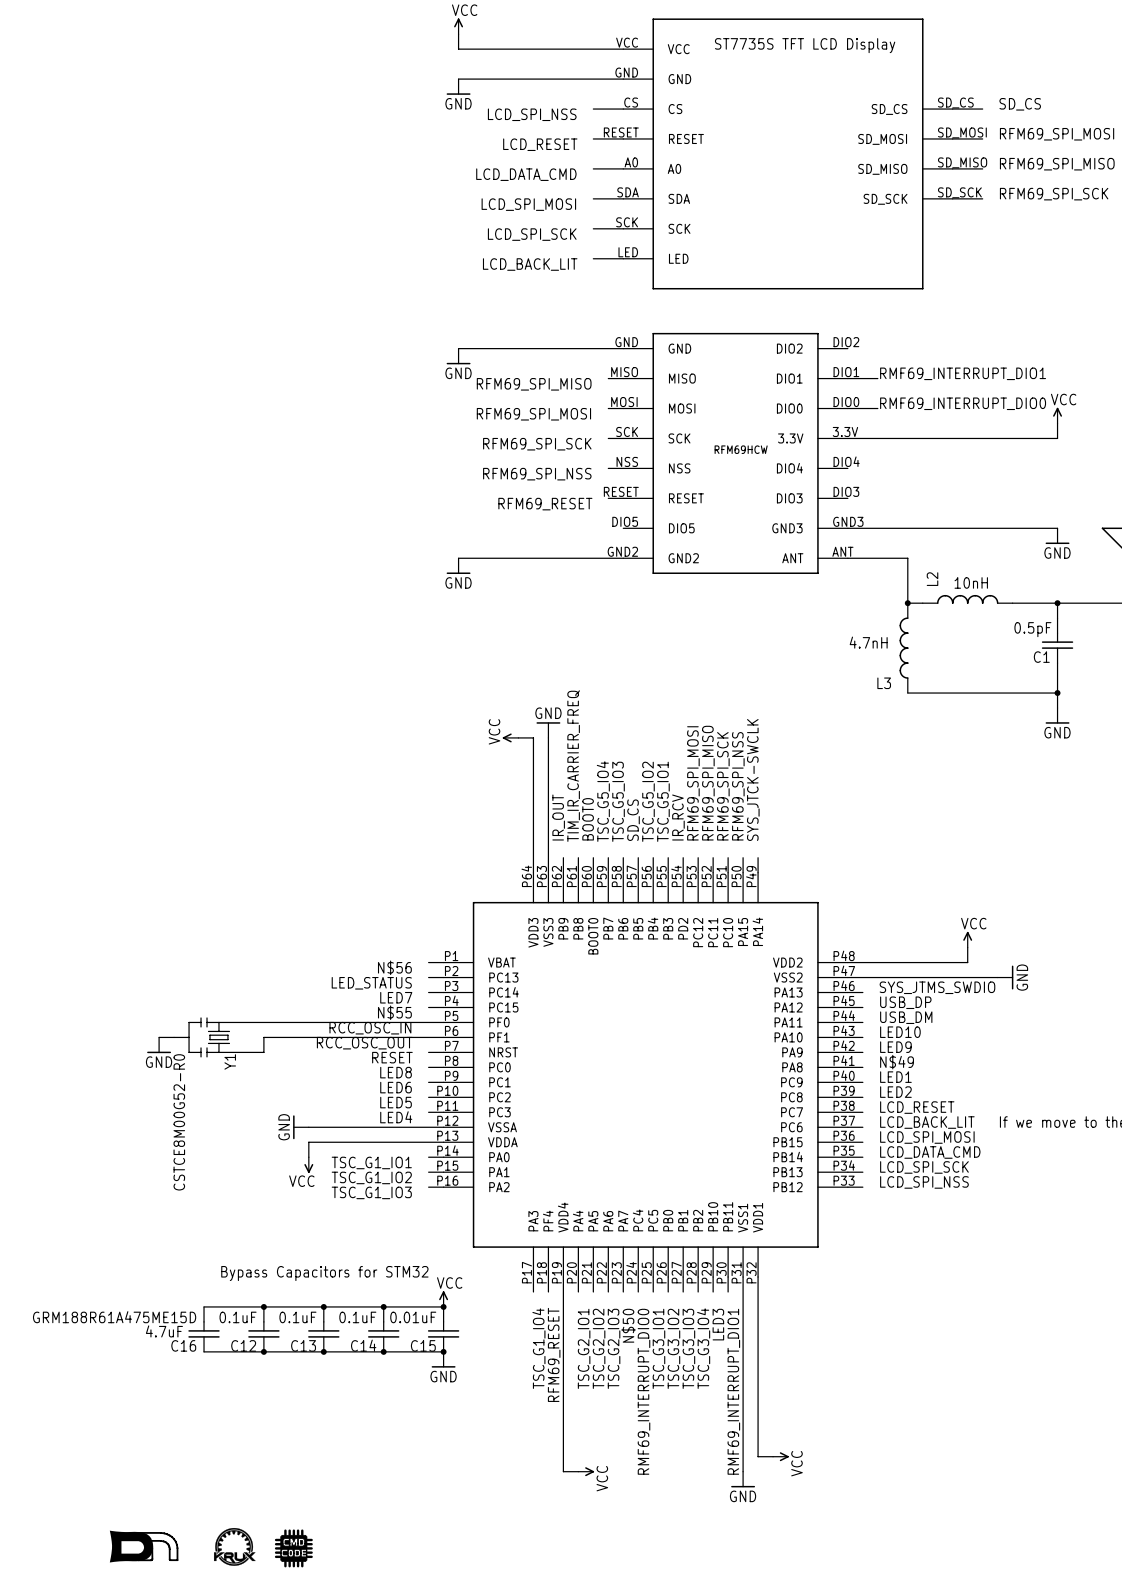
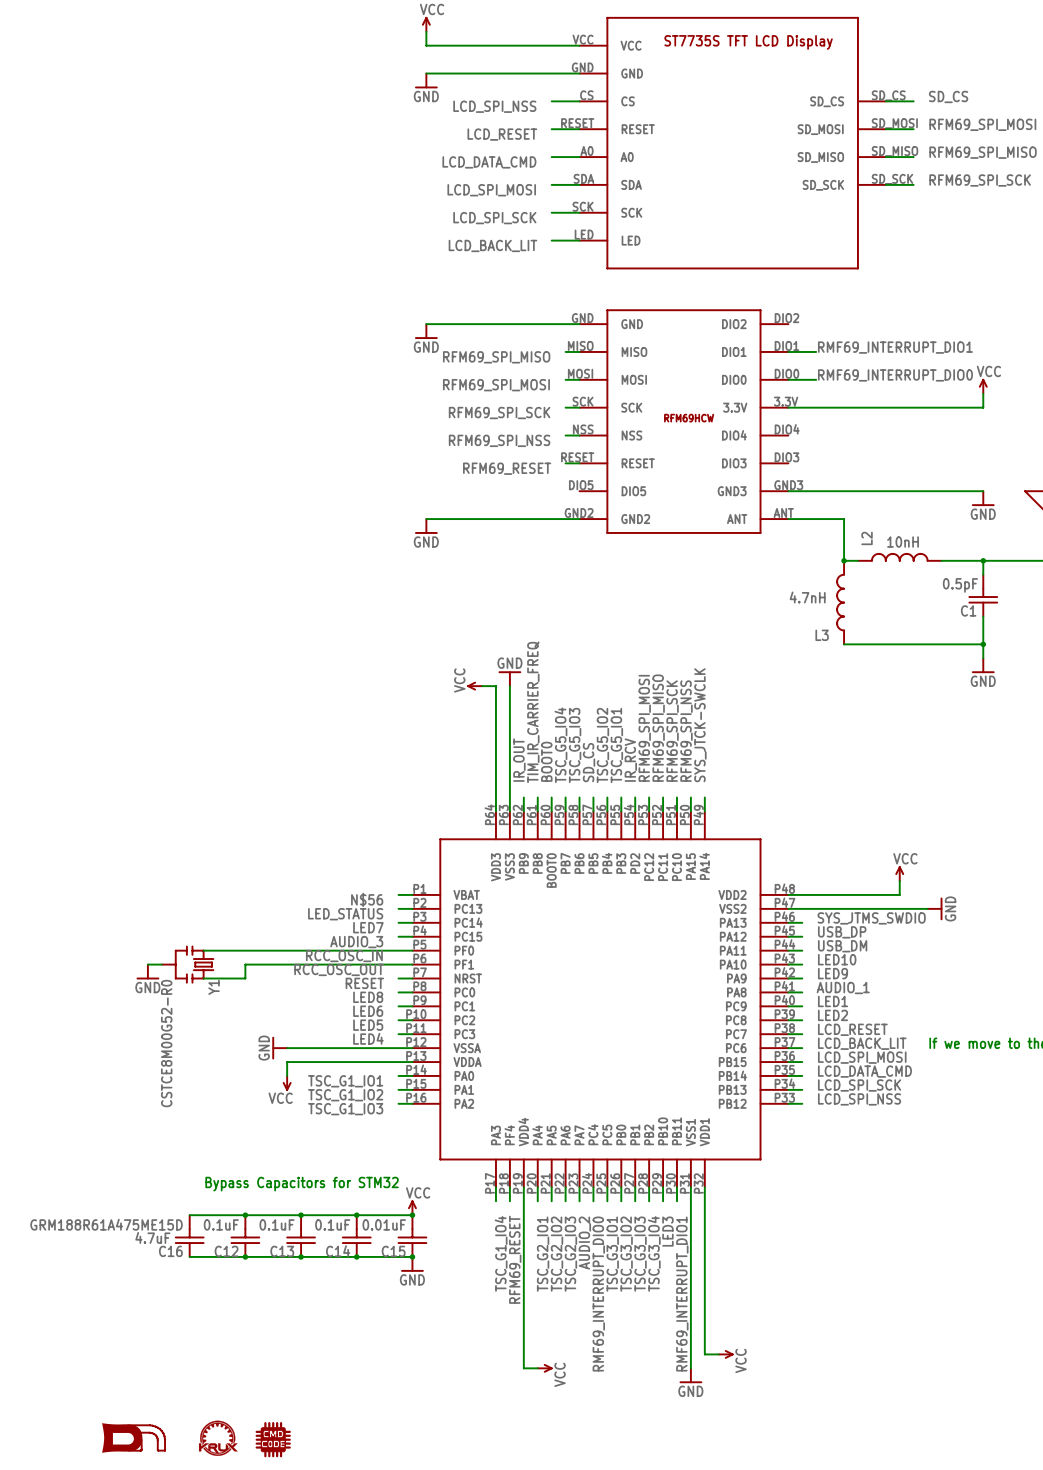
label: N$55 (394, 1012) -> AUDIO_3 (356, 942)
label: N$49 (897, 1062) -> AUDIO_1 (843, 988)
label: N$50 (628, 1325) -> AUDIO_2 (584, 1243)

